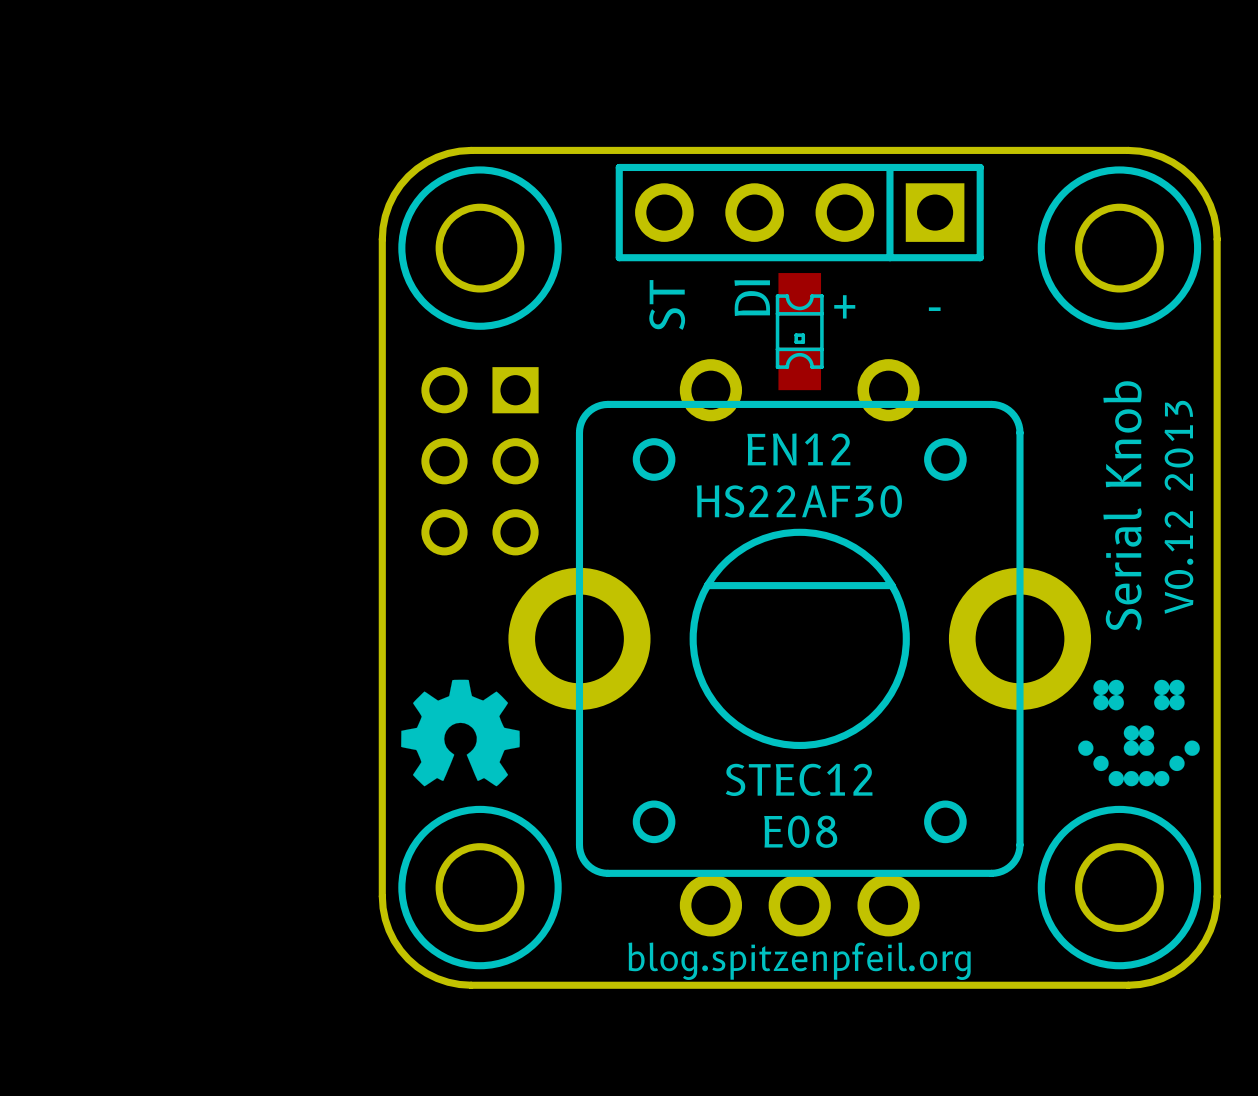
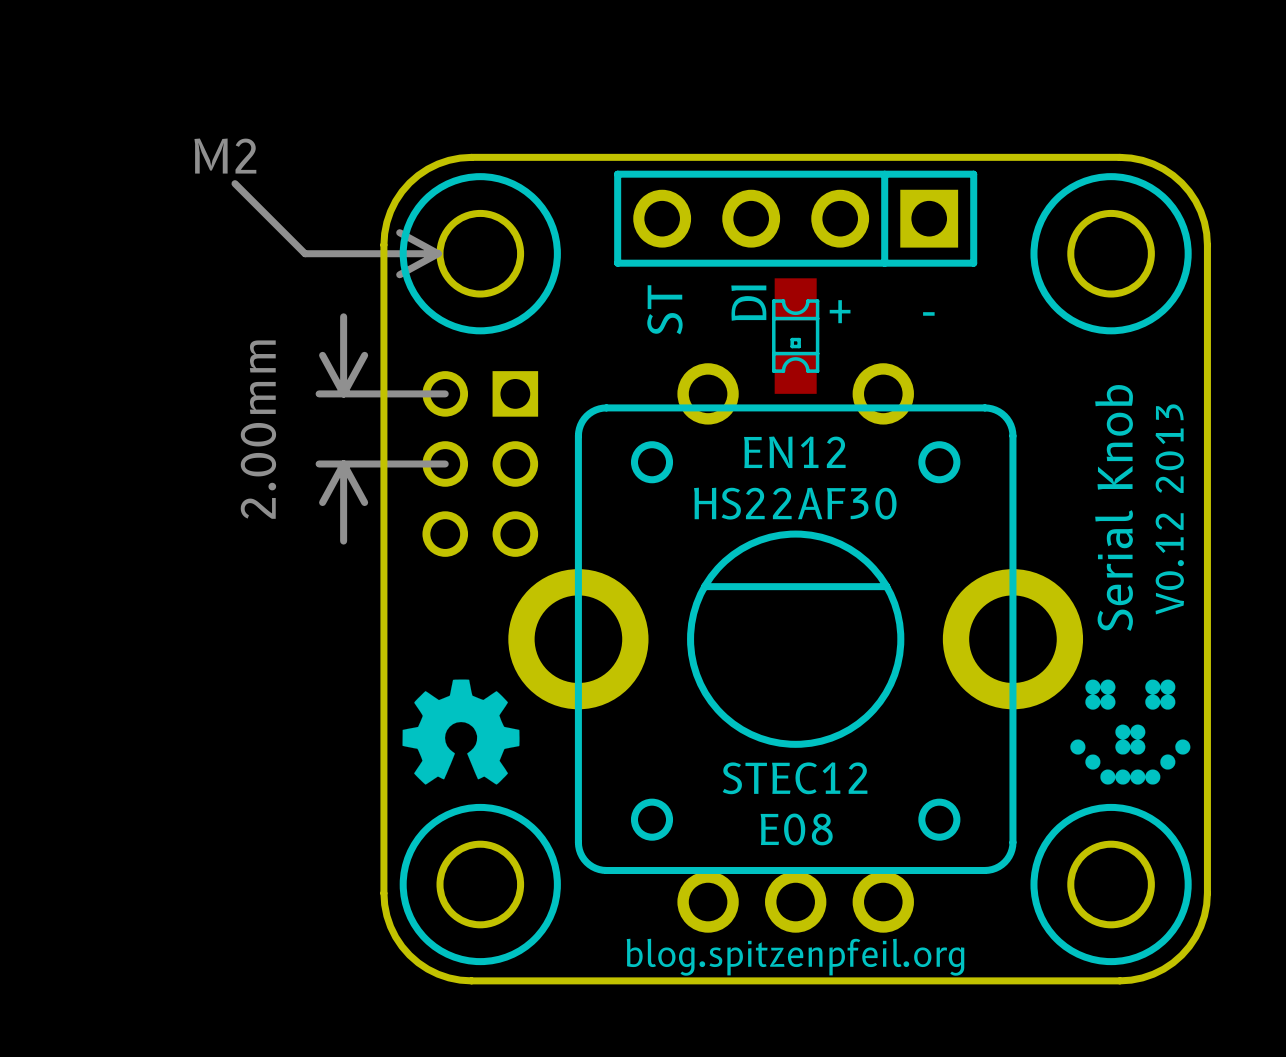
text: none -> M2 (225, 156)
line: none -> (234, 183) (305, 253) (436, 253)
line: none -> (399, 232) (438, 253) (399, 274)
line: none -> (343, 316) (343, 393)
line: none -> (322, 355) (343, 393)
line: none -> (364, 355) (343, 393)
line: none -> (319, 393) (445, 393)
text: none -> 2.00mm (258, 429)
line: none -> (319, 463) (445, 463)
line: none -> (343, 463) (343, 541)
line: none -> (343, 463) (364, 502)
line: none -> (343, 463) (322, 502)

